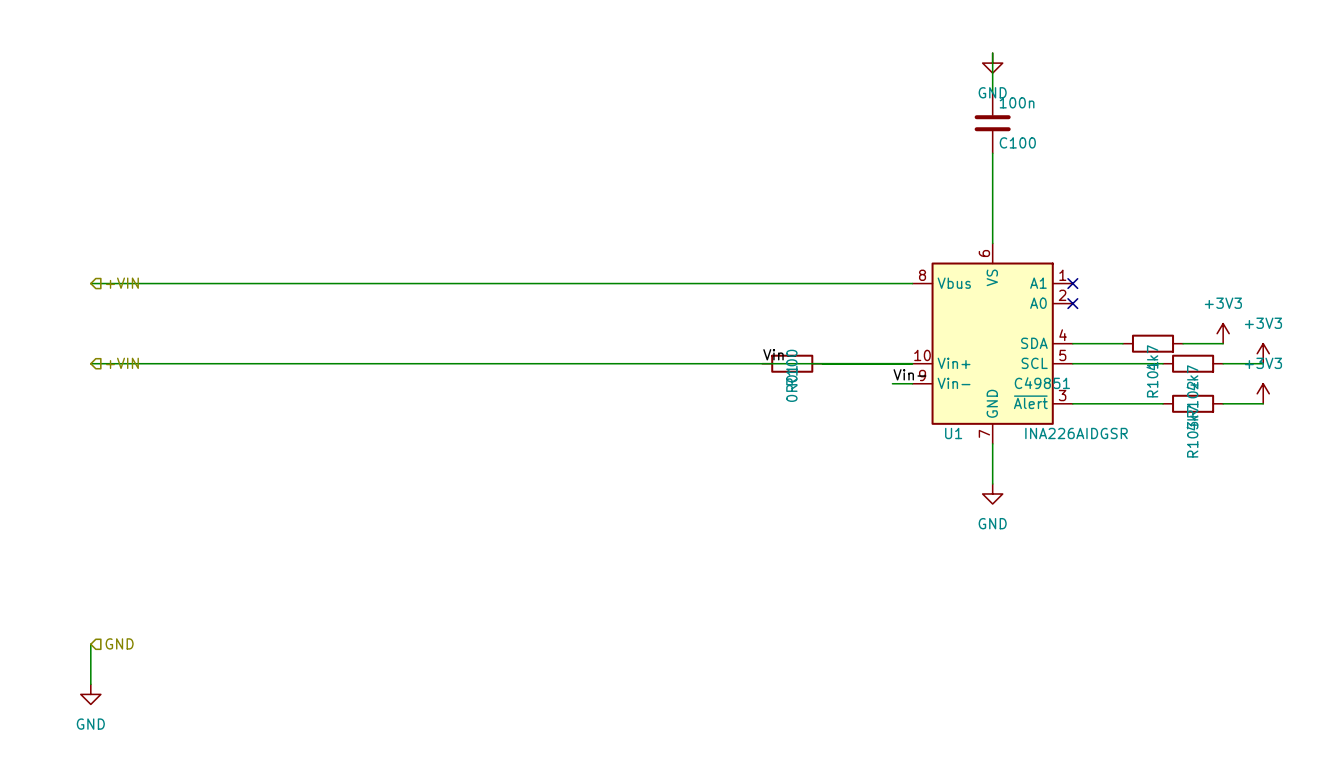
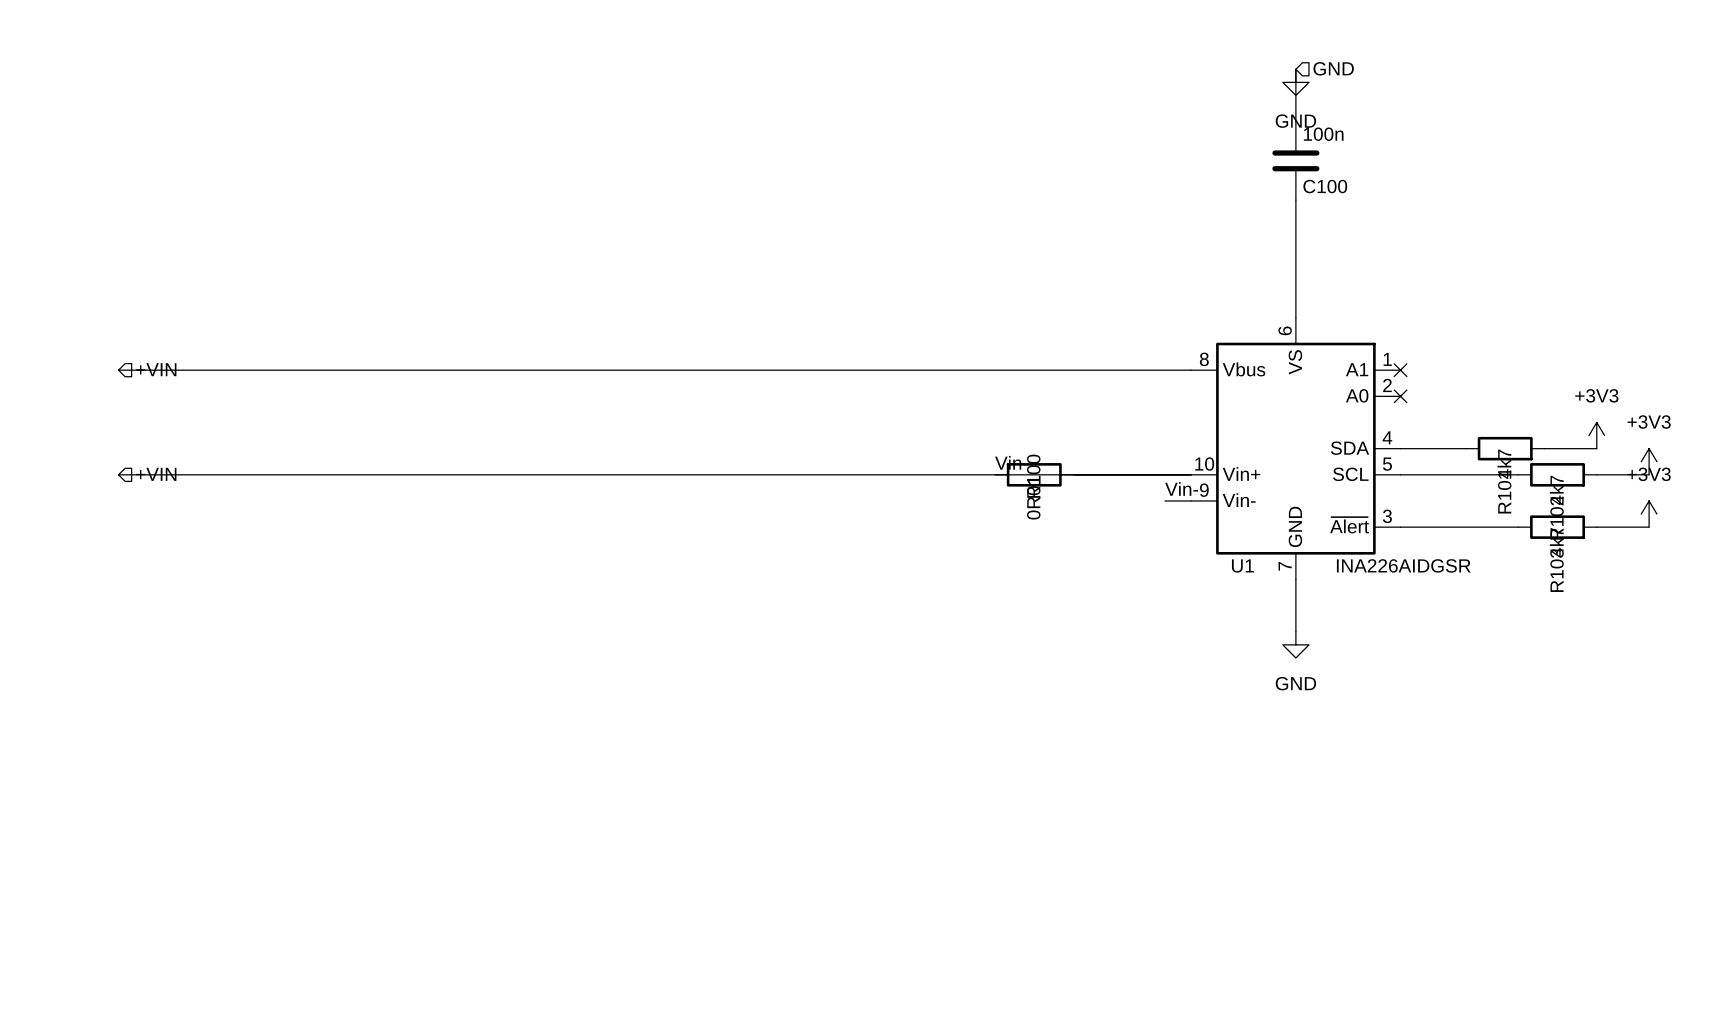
hierarchical label: none -> GND (1333, 68)
U1 text: C49851 (1042, 383) -> none
hierarchical label: GND (119, 643) -> none
wire: (90, 644) (90, 684) -> none
power symbol: GND (90, 694) -> none

